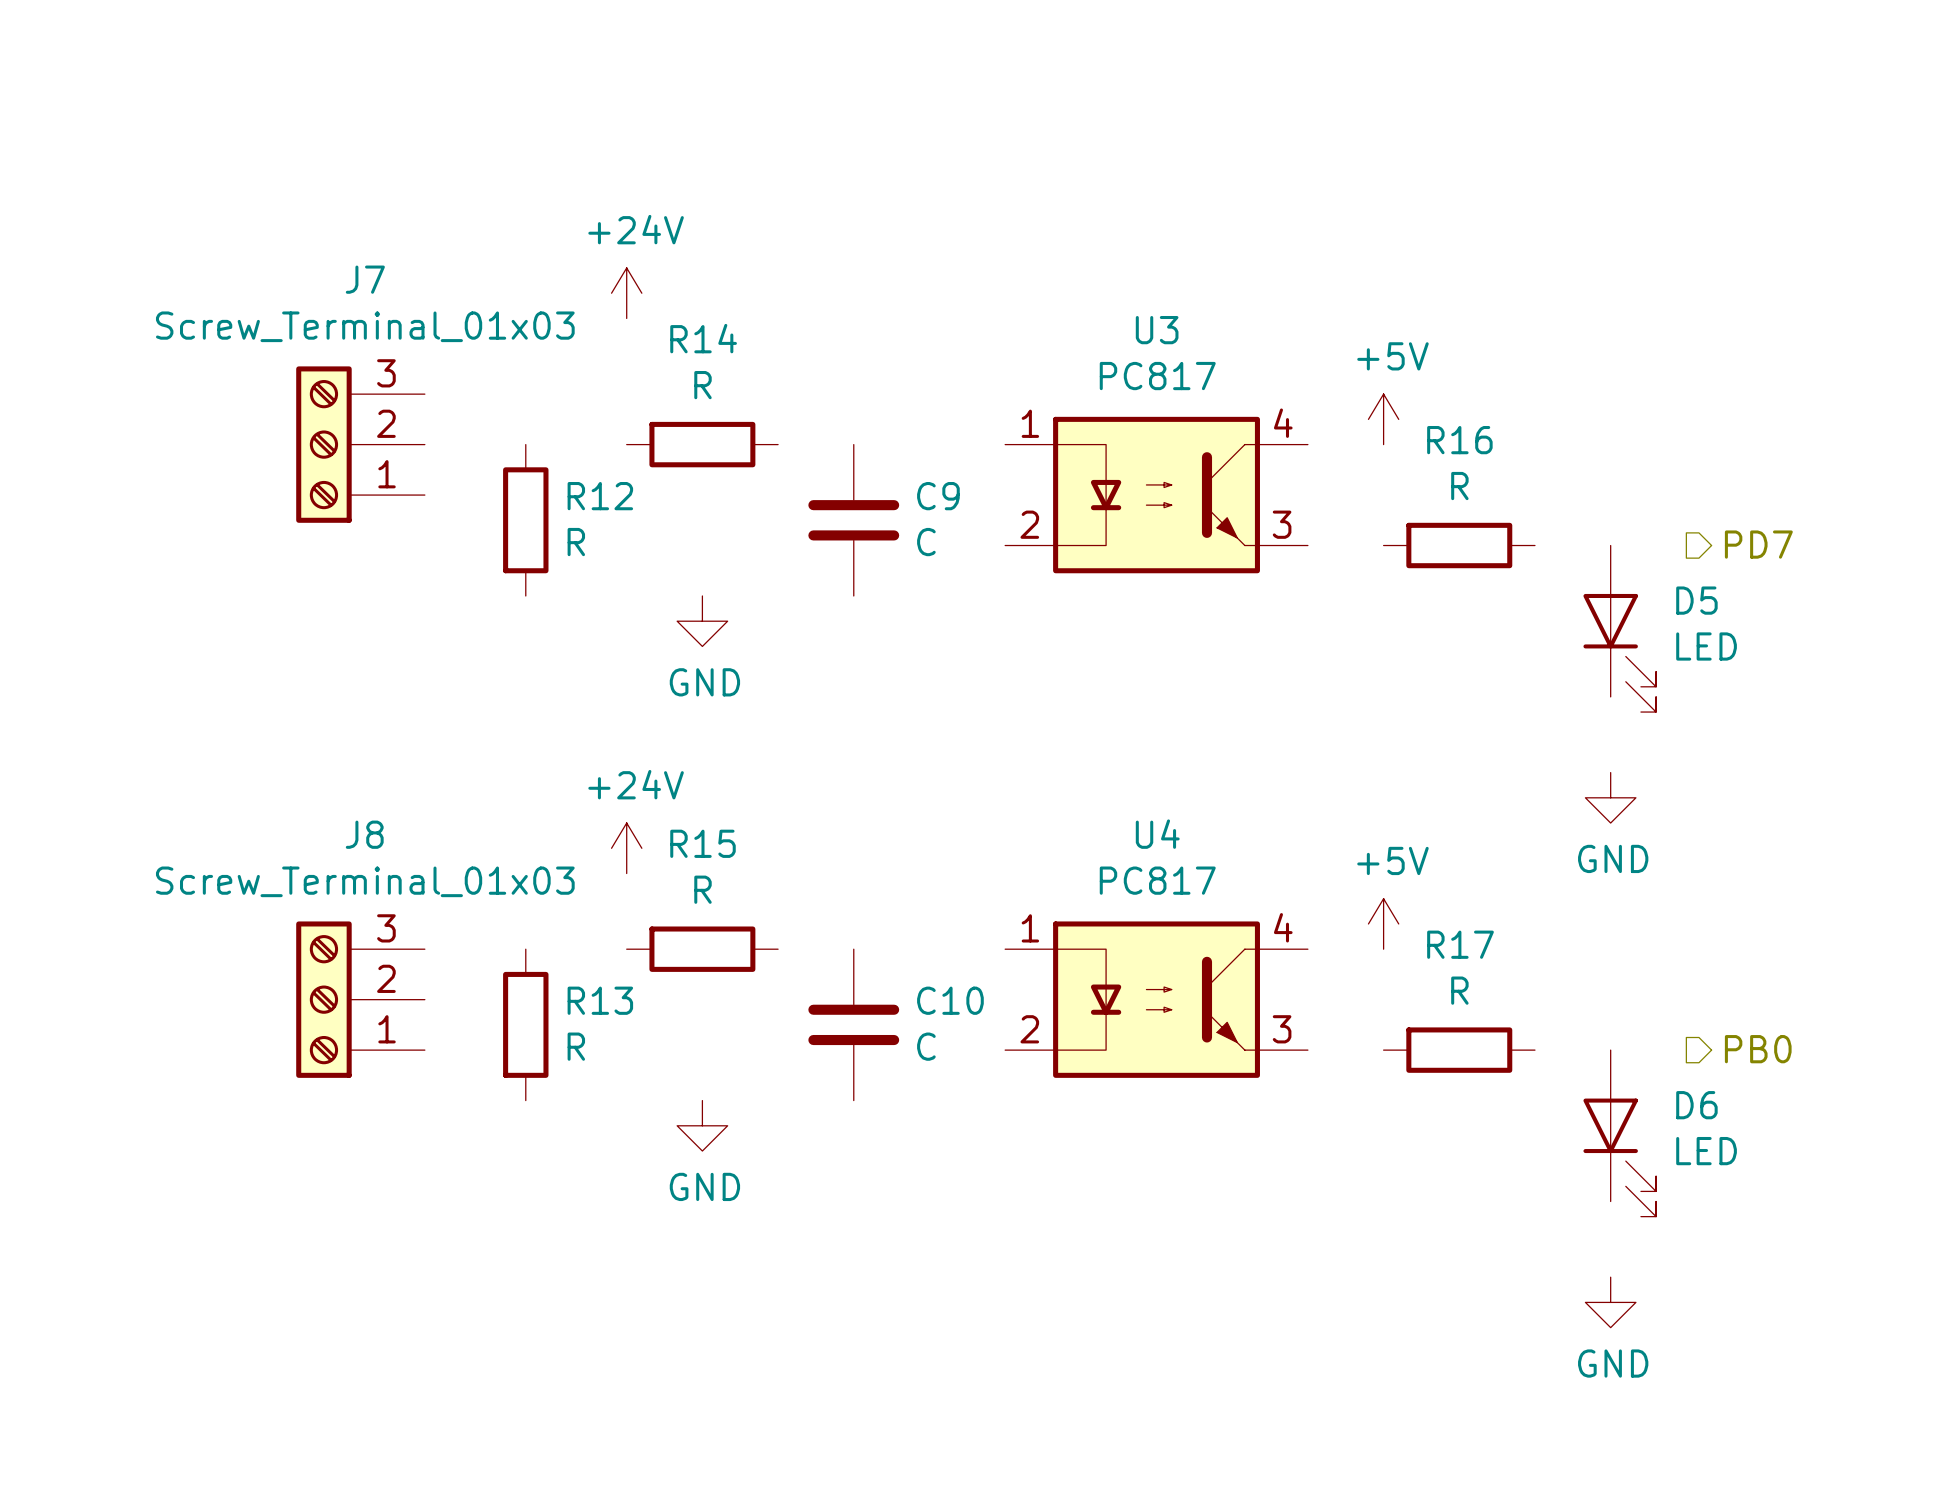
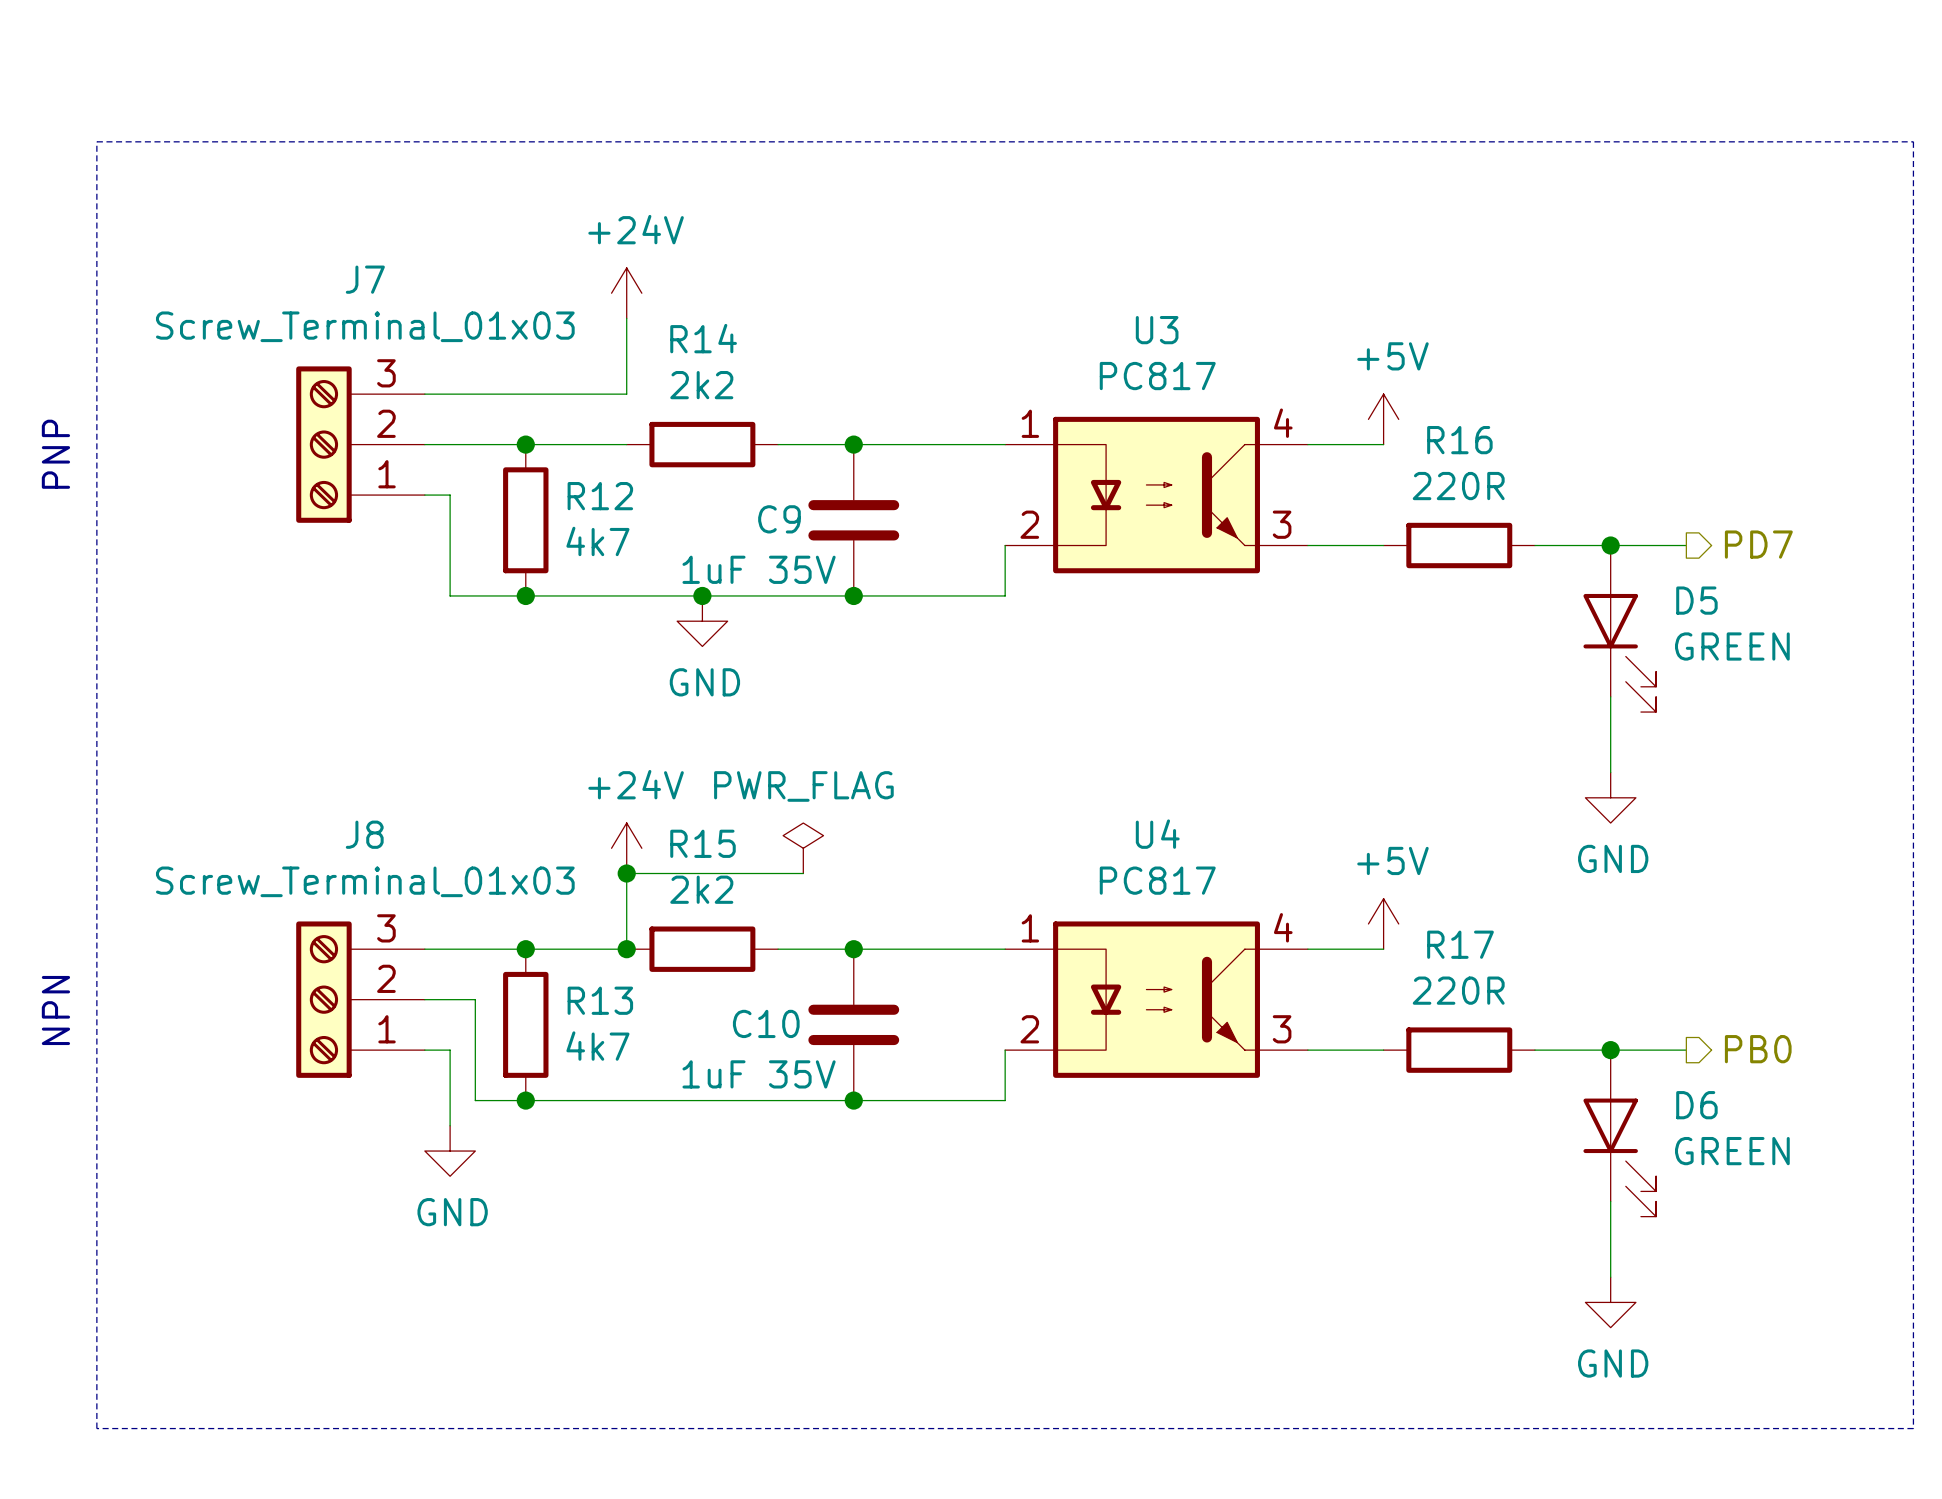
line: none -> (96, 141) (96, 1428) (1913, 1428) (1913, 141) (96, 141)
wire: none -> (626, 318) (626, 394) (424, 394)
R14 value: R (702, 385) -> 2k2 (701, 385)
wire: none -> (424, 444) (626, 444)
junction: none -> (525, 444)
wire: none -> (778, 444) (1005, 444)
junction: none -> (853, 444)
wire: none -> (1307, 444) (1383, 444)
text: none -> PNP (55, 454)
R16 value: R (1459, 486) -> 220R (1458, 486)
wire: none -> (424, 495) (450, 495) (450, 595) (1005, 595) (1005, 545)
C9 name position: C9 (938, 496) -> C9 (779, 519)
R12 value: R (576, 542) -> 4k7 (597, 541)
C9 value: C (926, 542) -> 1uF 35V (759, 569)
wire: none -> (1307, 545) (1383, 545)
wire: none -> (1534, 545) (1686, 545)
junction: none -> (1610, 545)
junction: none -> (525, 595)
junction: none -> (702, 595)
junction: none -> (853, 595)
D5 value: LED (1706, 646) -> GREEN (1732, 646)
wire: none -> (1610, 696) (1610, 772)
power symbol: none -> PWR_FLAG (803, 848)
junction: none -> (626, 873)
wire: none -> (803, 873) (626, 873) (626, 949) (424, 949)
R15 value: R (702, 889) -> 2k2 (701, 889)
junction: none -> (525, 949)
junction: none -> (626, 949)
wire: none -> (778, 949) (1005, 949)
junction: none -> (853, 949)
wire: none -> (1307, 949) (1383, 949)
R17 value: R (1459, 990) -> 220R (1458, 990)
wire: none -> (424, 999) (475, 999) (475, 1100) (1005, 1100) (1005, 1050)
C10 name position: C10 (950, 1000) -> C10 (766, 1023)
text: none -> NPN (55, 1010)
R13 value: R (576, 1046) -> 4k7 (597, 1046)
C10 value: C (926, 1046) -> 1uF 35V (759, 1074)
wire: none -> (424, 1050) (450, 1050) (450, 1125)
wire: none -> (1307, 1050) (1383, 1050)
wire: none -> (1534, 1050) (1686, 1050)
junction: none -> (1610, 1050)
junction: none -> (525, 1100)
junction: none -> (853, 1100)
power symbol position: GND (702, 1125) -> GND (450, 1151)
D6 value: LED (1706, 1151) -> GREEN (1732, 1151)
wire: none -> (1610, 1201) (1610, 1277)

